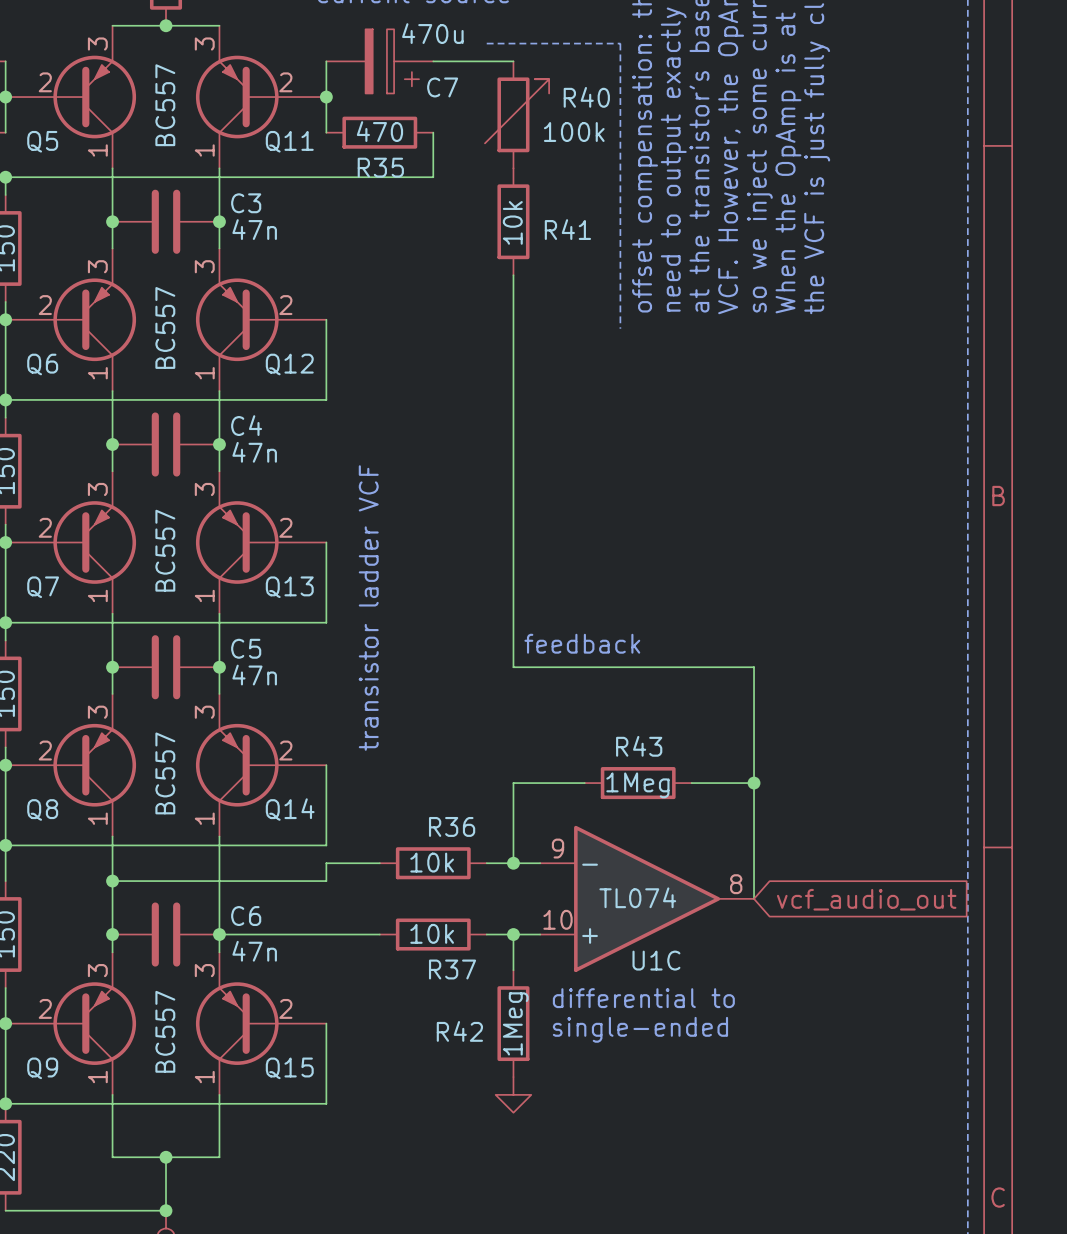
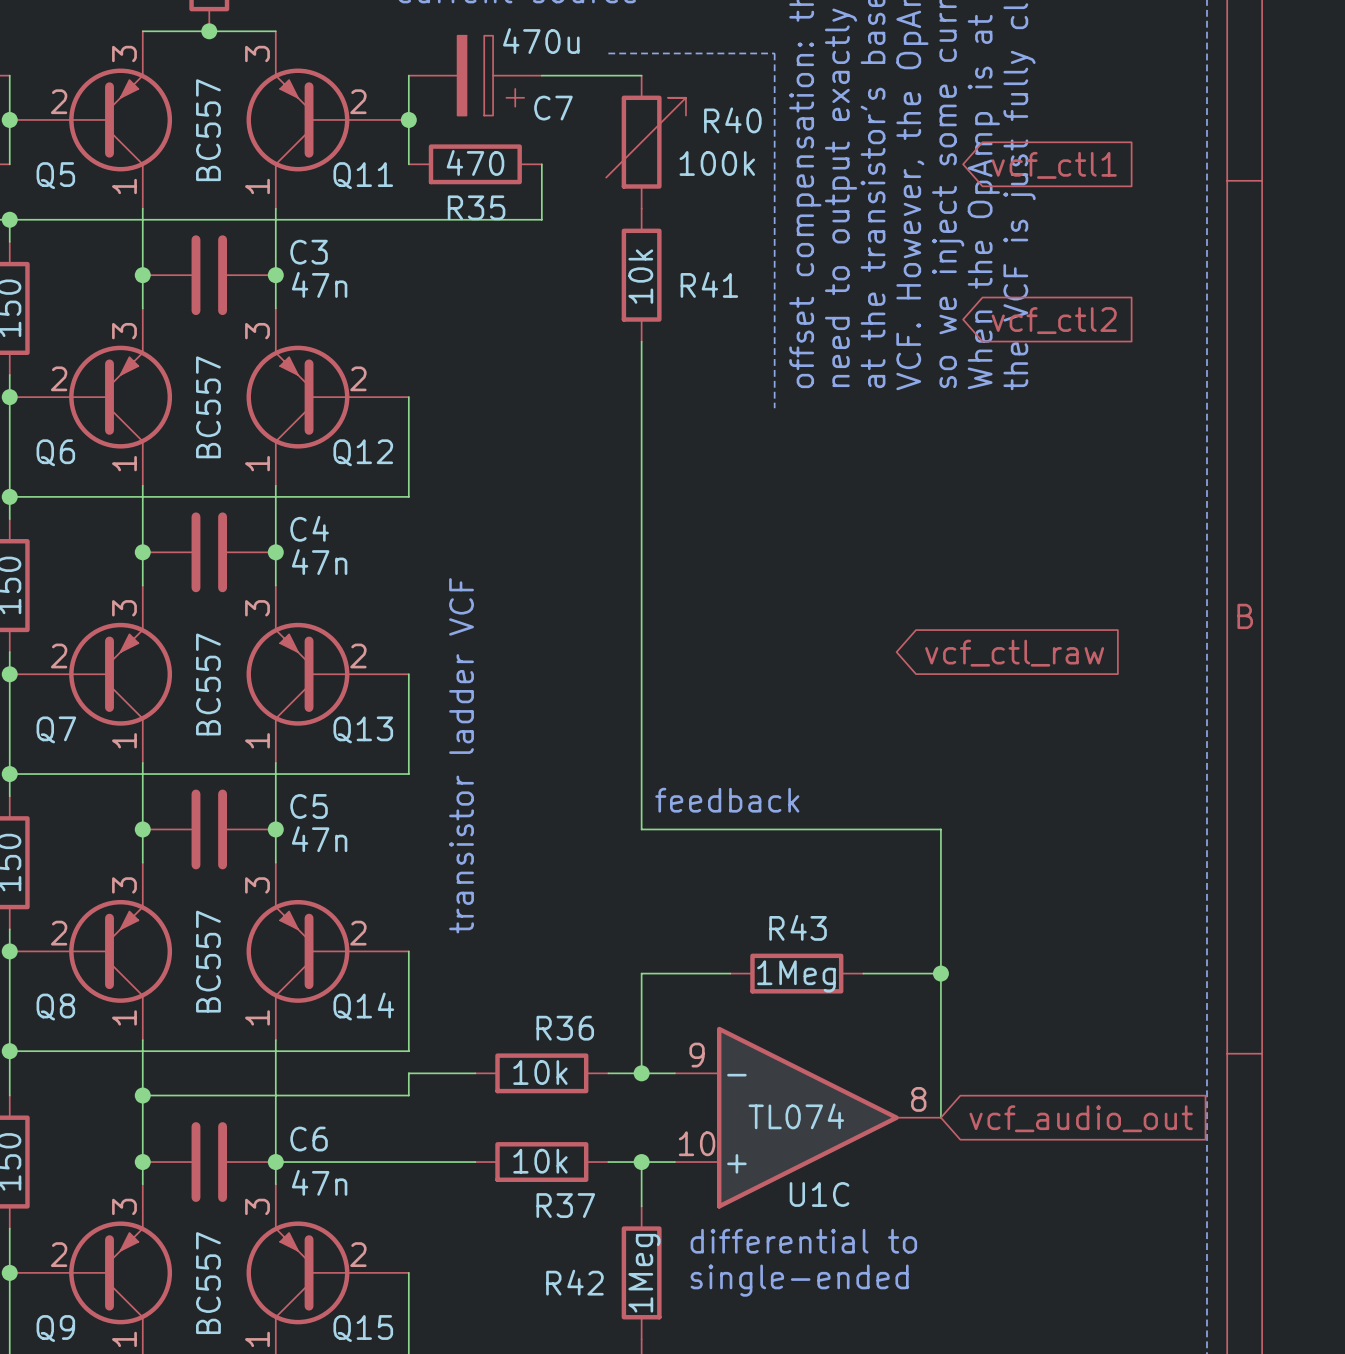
global label: none -> vcf_ctl1 (1054, 165)
global label: none -> vcf_ctl2 (1054, 320)
global label: none -> vcf_ctl_raw (1014, 653)

